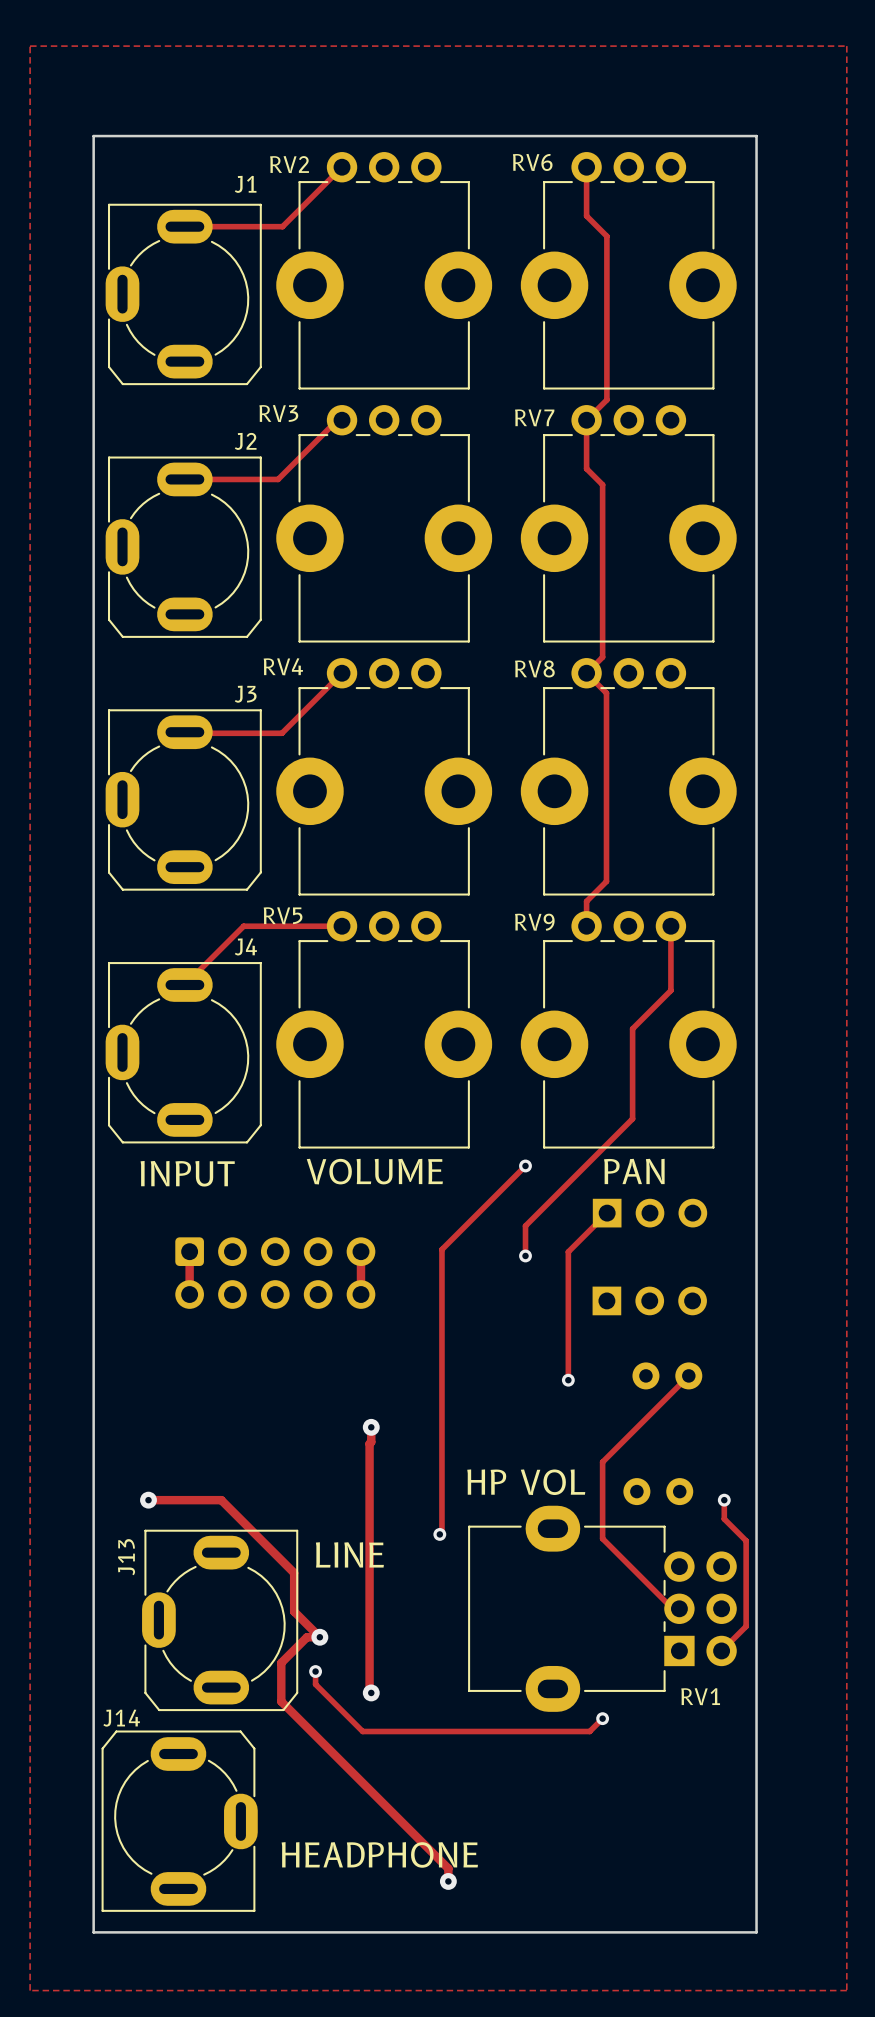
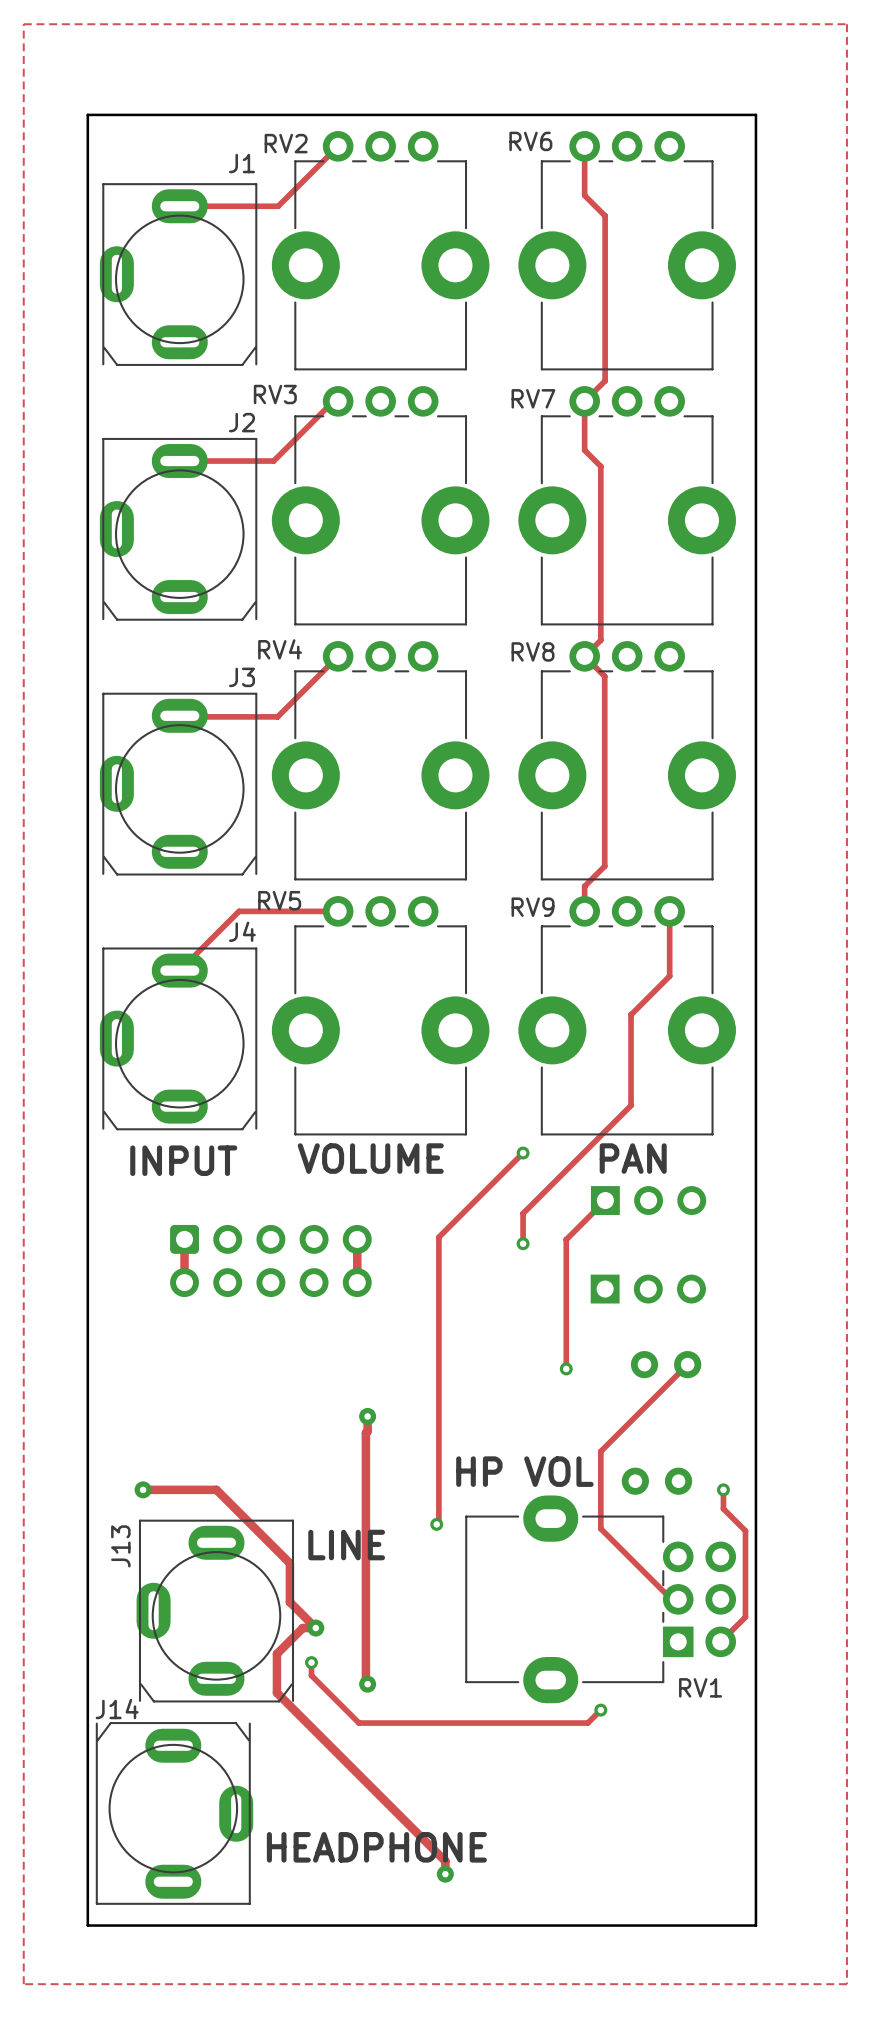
J1 footprint: [105, 203, 262, 386] -> [99, 183, 258, 366]
J2 footprint: [105, 456, 262, 638] -> [99, 437, 258, 621]
J3 footprint: [105, 709, 262, 891] -> [99, 692, 258, 876]
J4 footprint: [105, 962, 262, 1144] -> [99, 947, 258, 1131]
J13 footprint: [142, 1529, 299, 1712] -> [136, 1519, 295, 1703]
J14 footprint: [101, 1730, 258, 1912] -> [95, 1722, 254, 1905]

